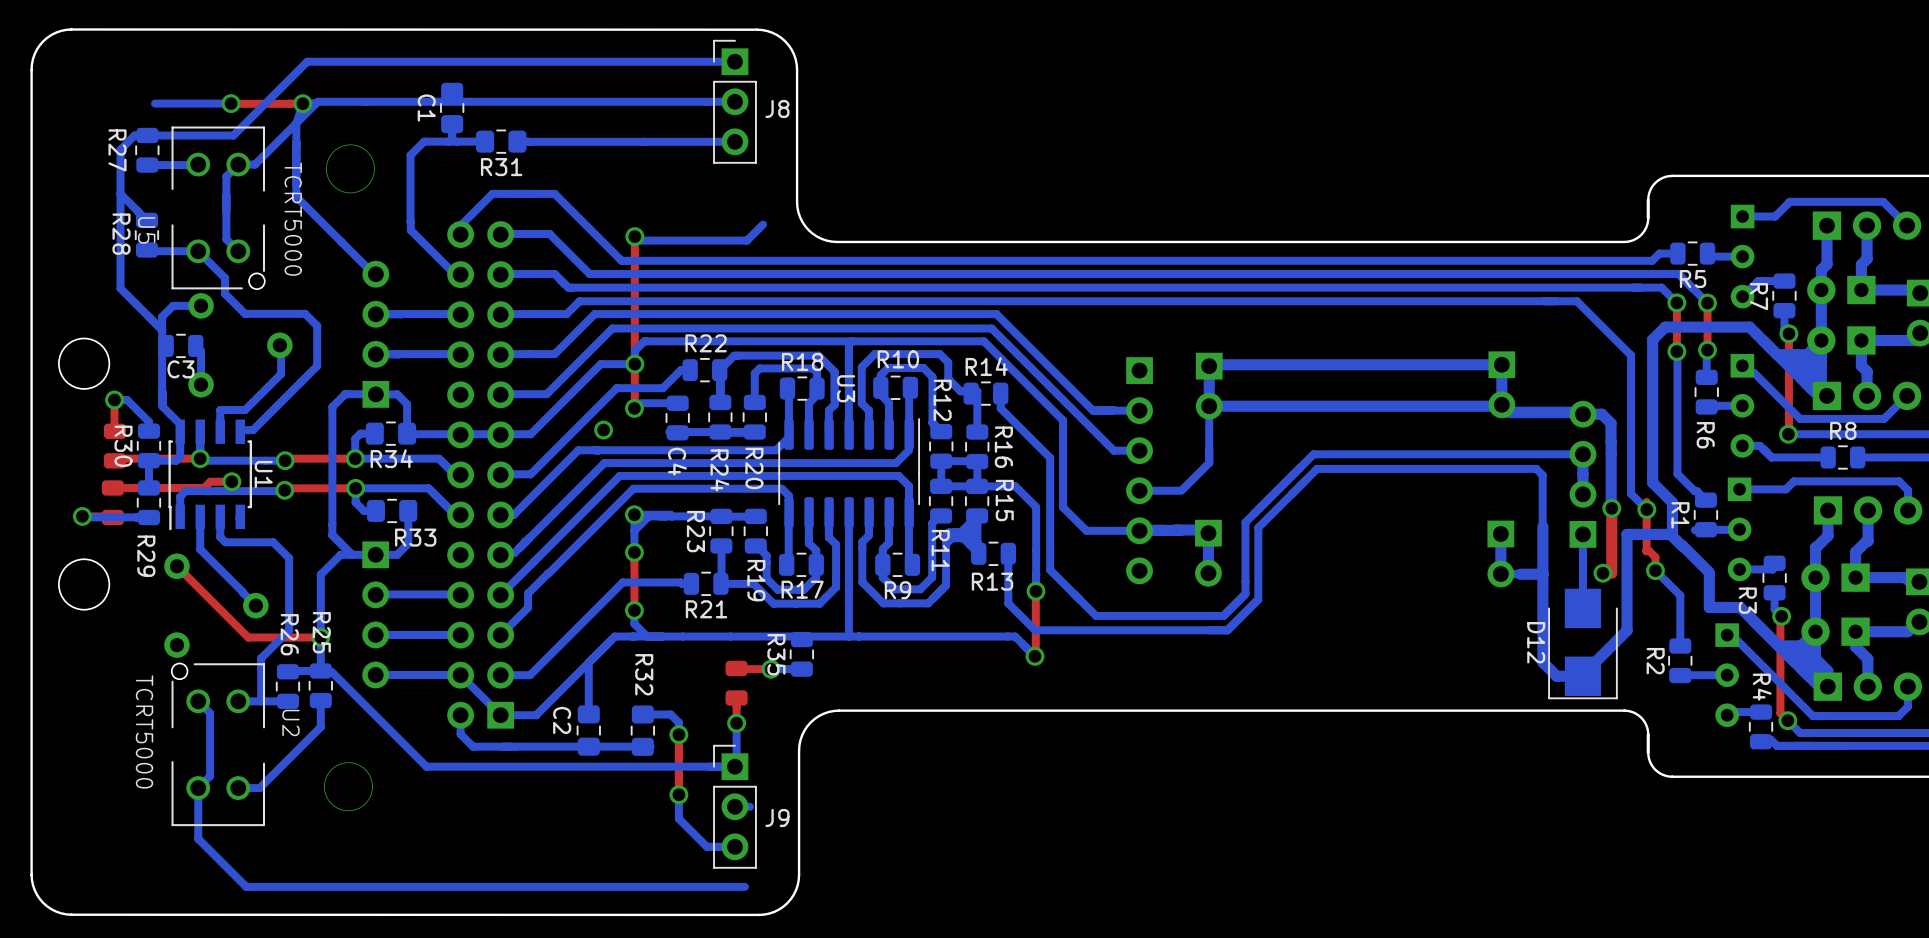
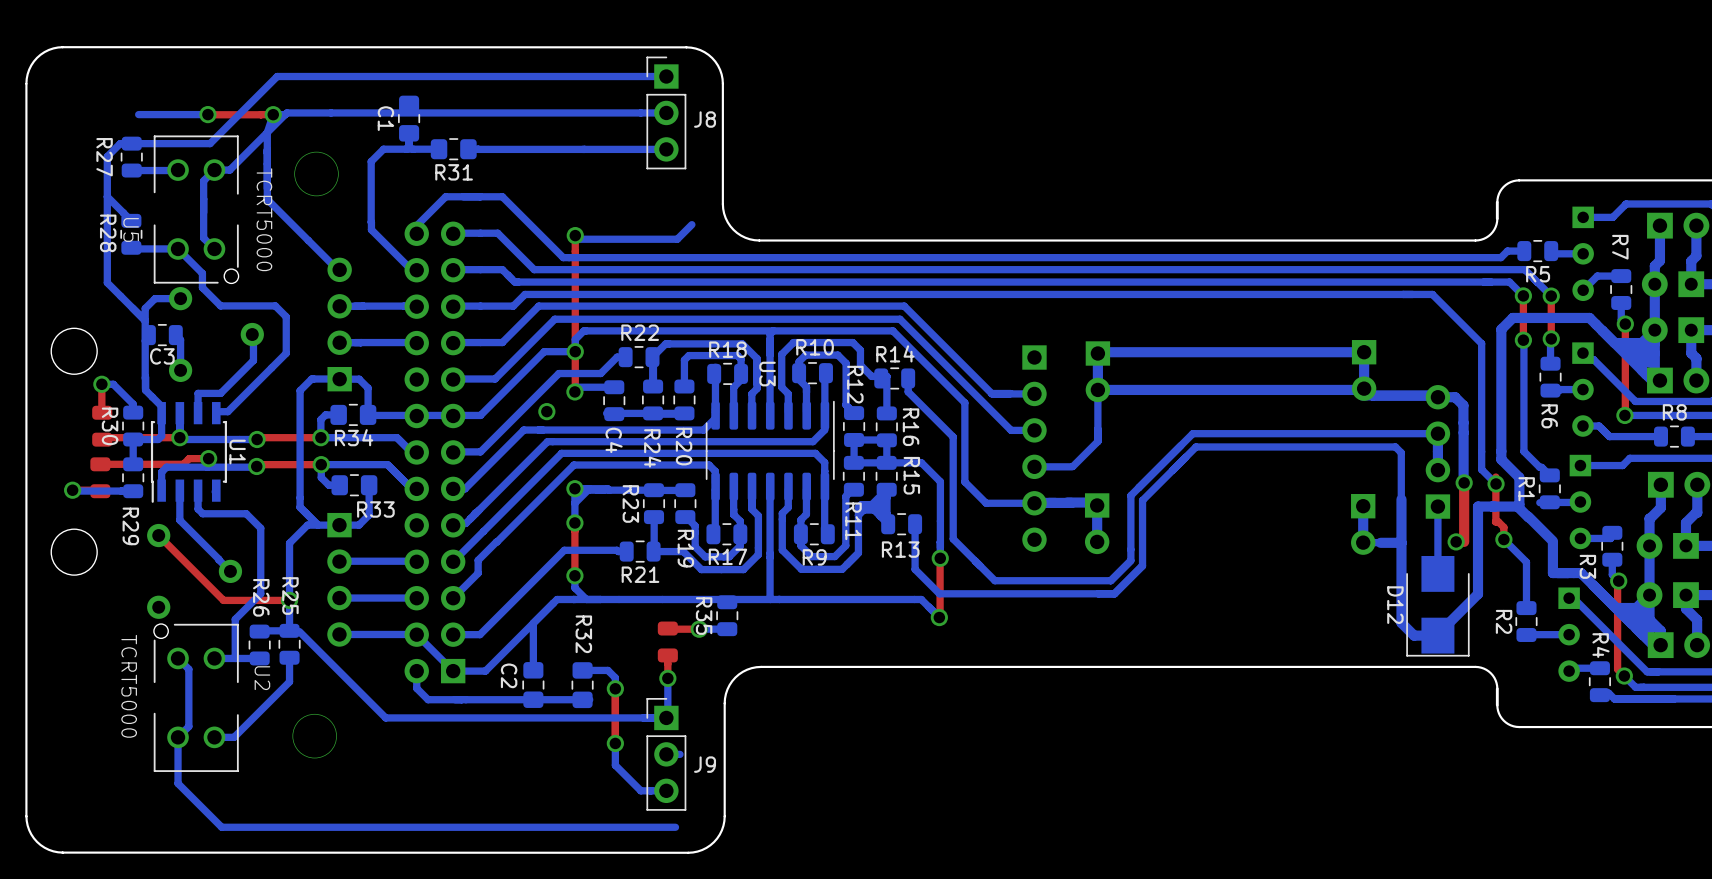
R7 name position: R7 (1759, 296) -> R7 (1620, 247)

